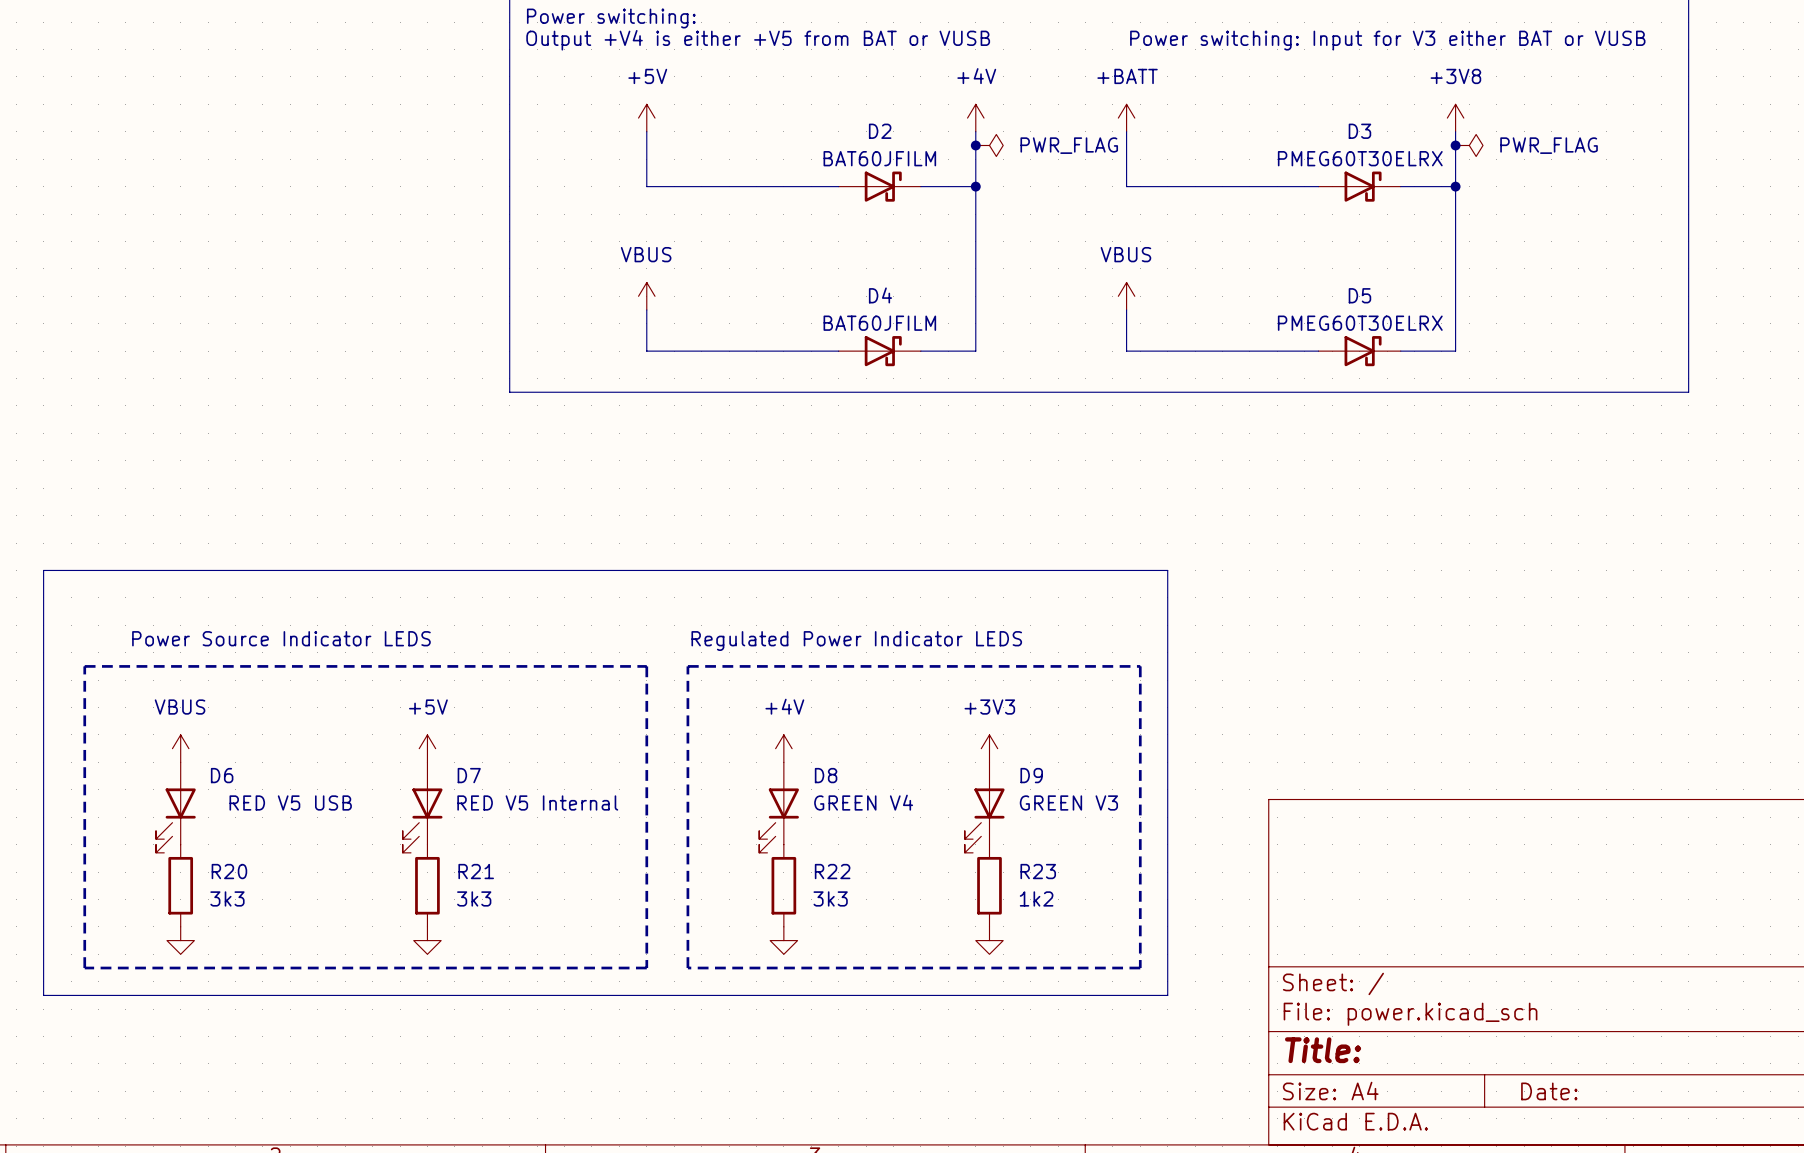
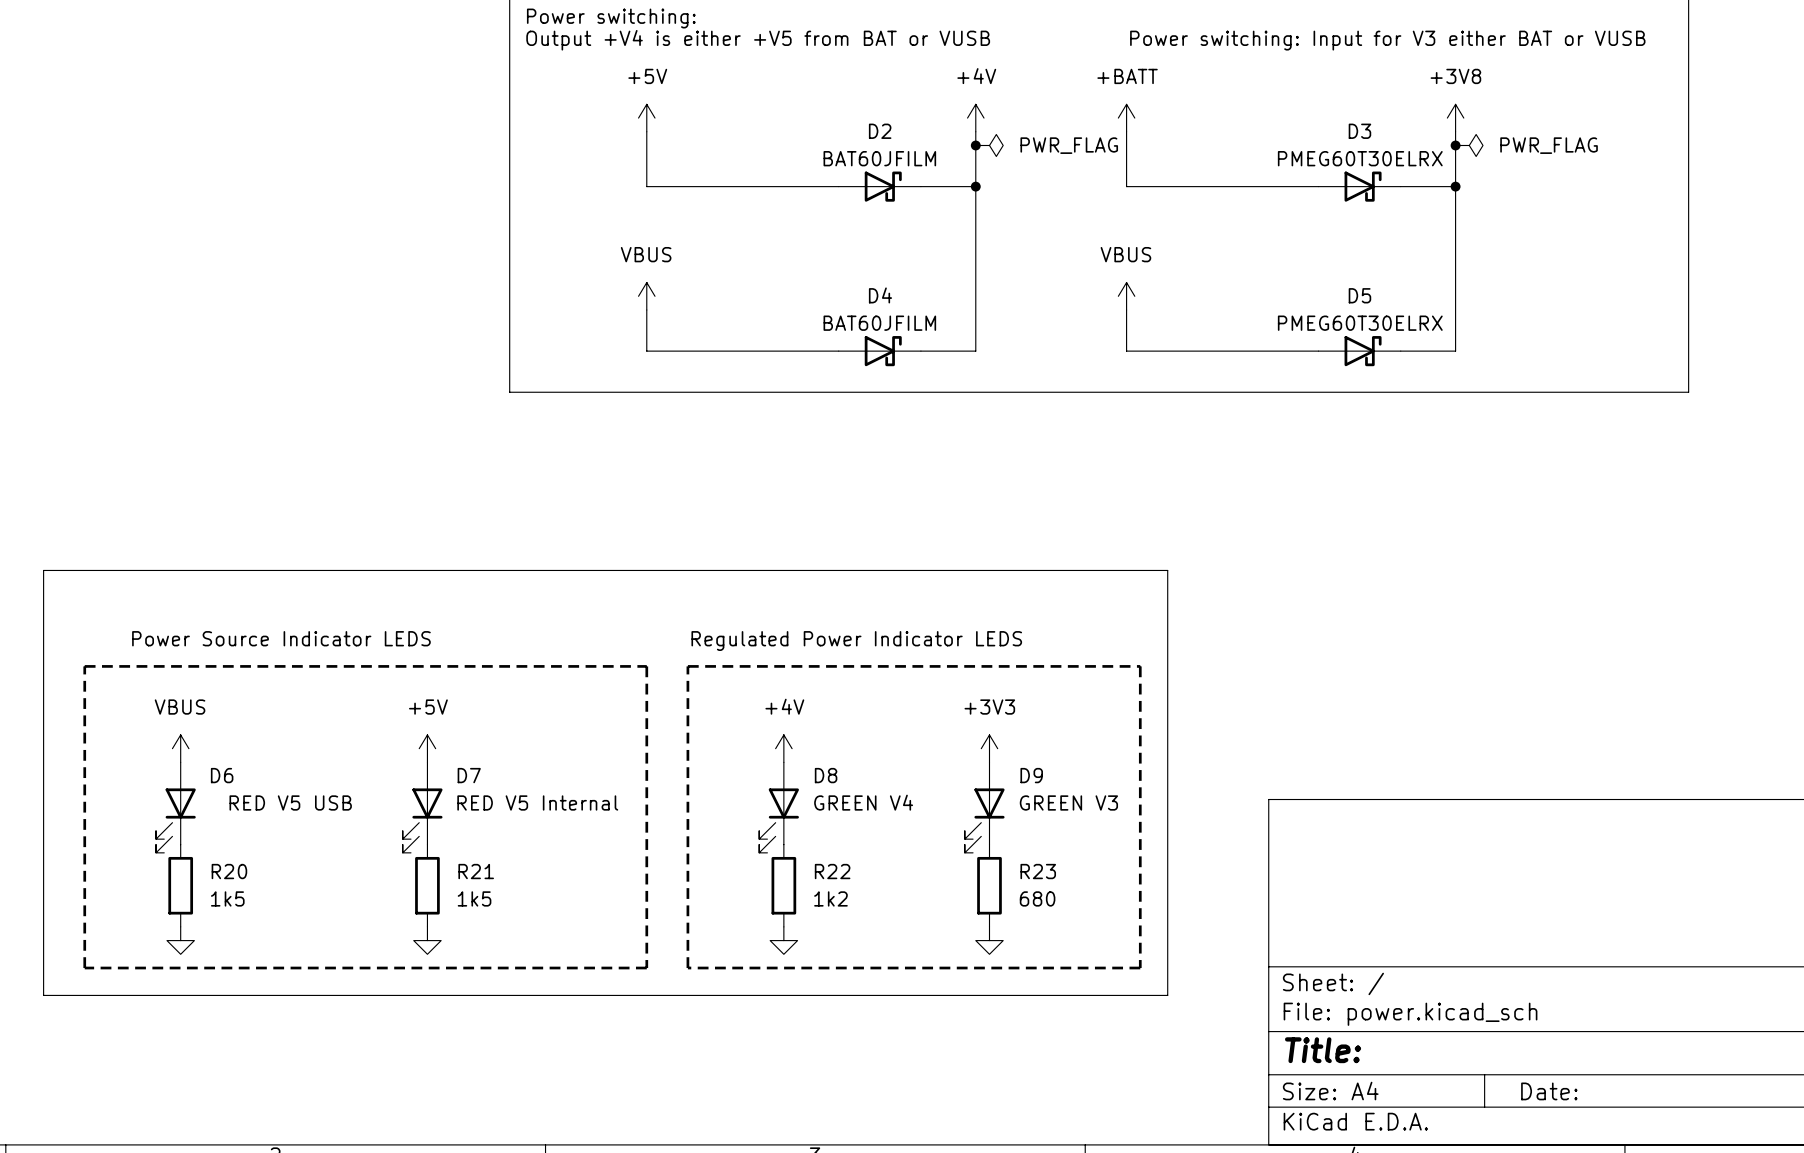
R20 value: 3k3 (227, 898) -> 1k5 (227, 898)
R21 value: 3k3 (474, 898) -> 1k5 (474, 898)
R22 value: 3k3 (830, 898) -> 1k2 (830, 898)
R23 value: 1k2 (1036, 898) -> 680 (1037, 898)

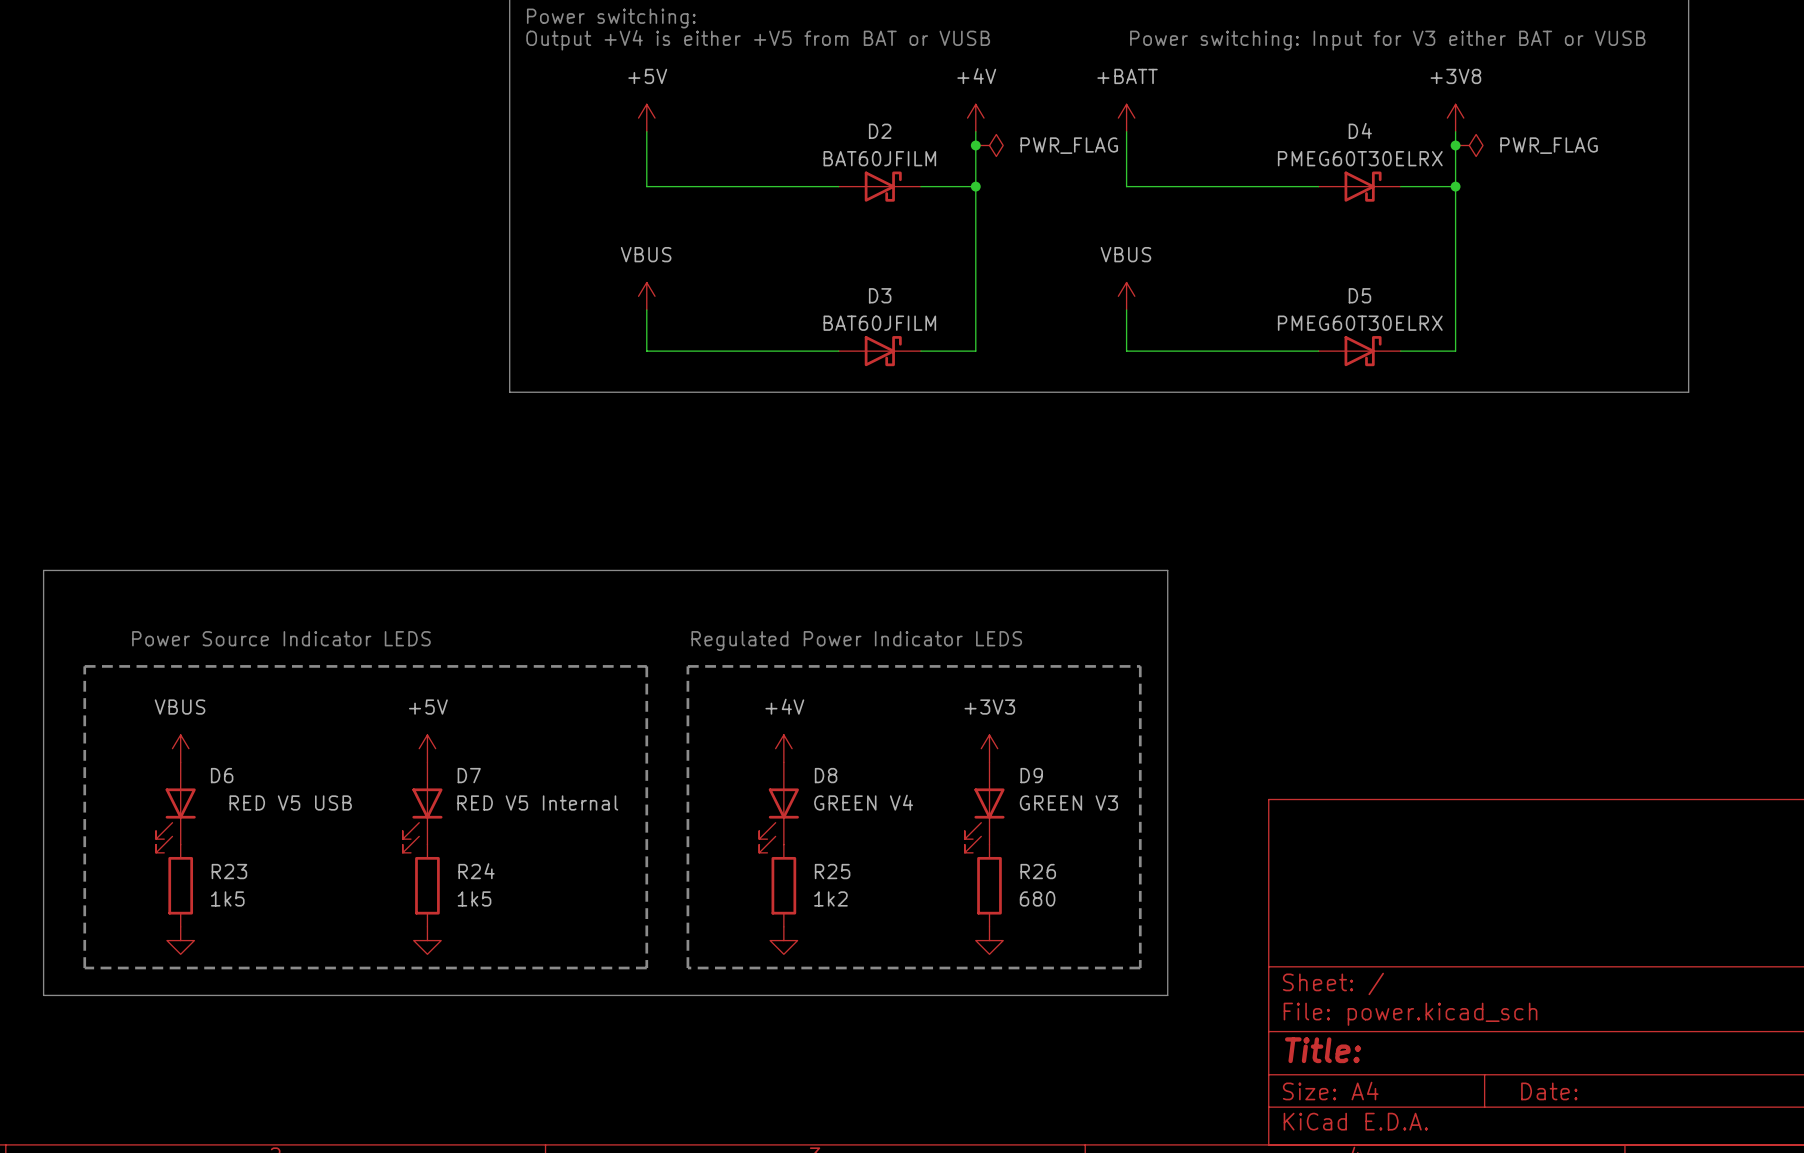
D3 name: D3 (1359, 131) -> D4 (1360, 130)
D4 name: D4 (880, 295) -> D3 (880, 295)
R20 name: R20 (229, 871) -> R23 (229, 871)
R21 name: R21 (476, 871) -> R24 (476, 871)
R22 name: R22 (832, 871) -> R25 (832, 871)
R23 name: R23 (1038, 871) -> R26 (1038, 871)

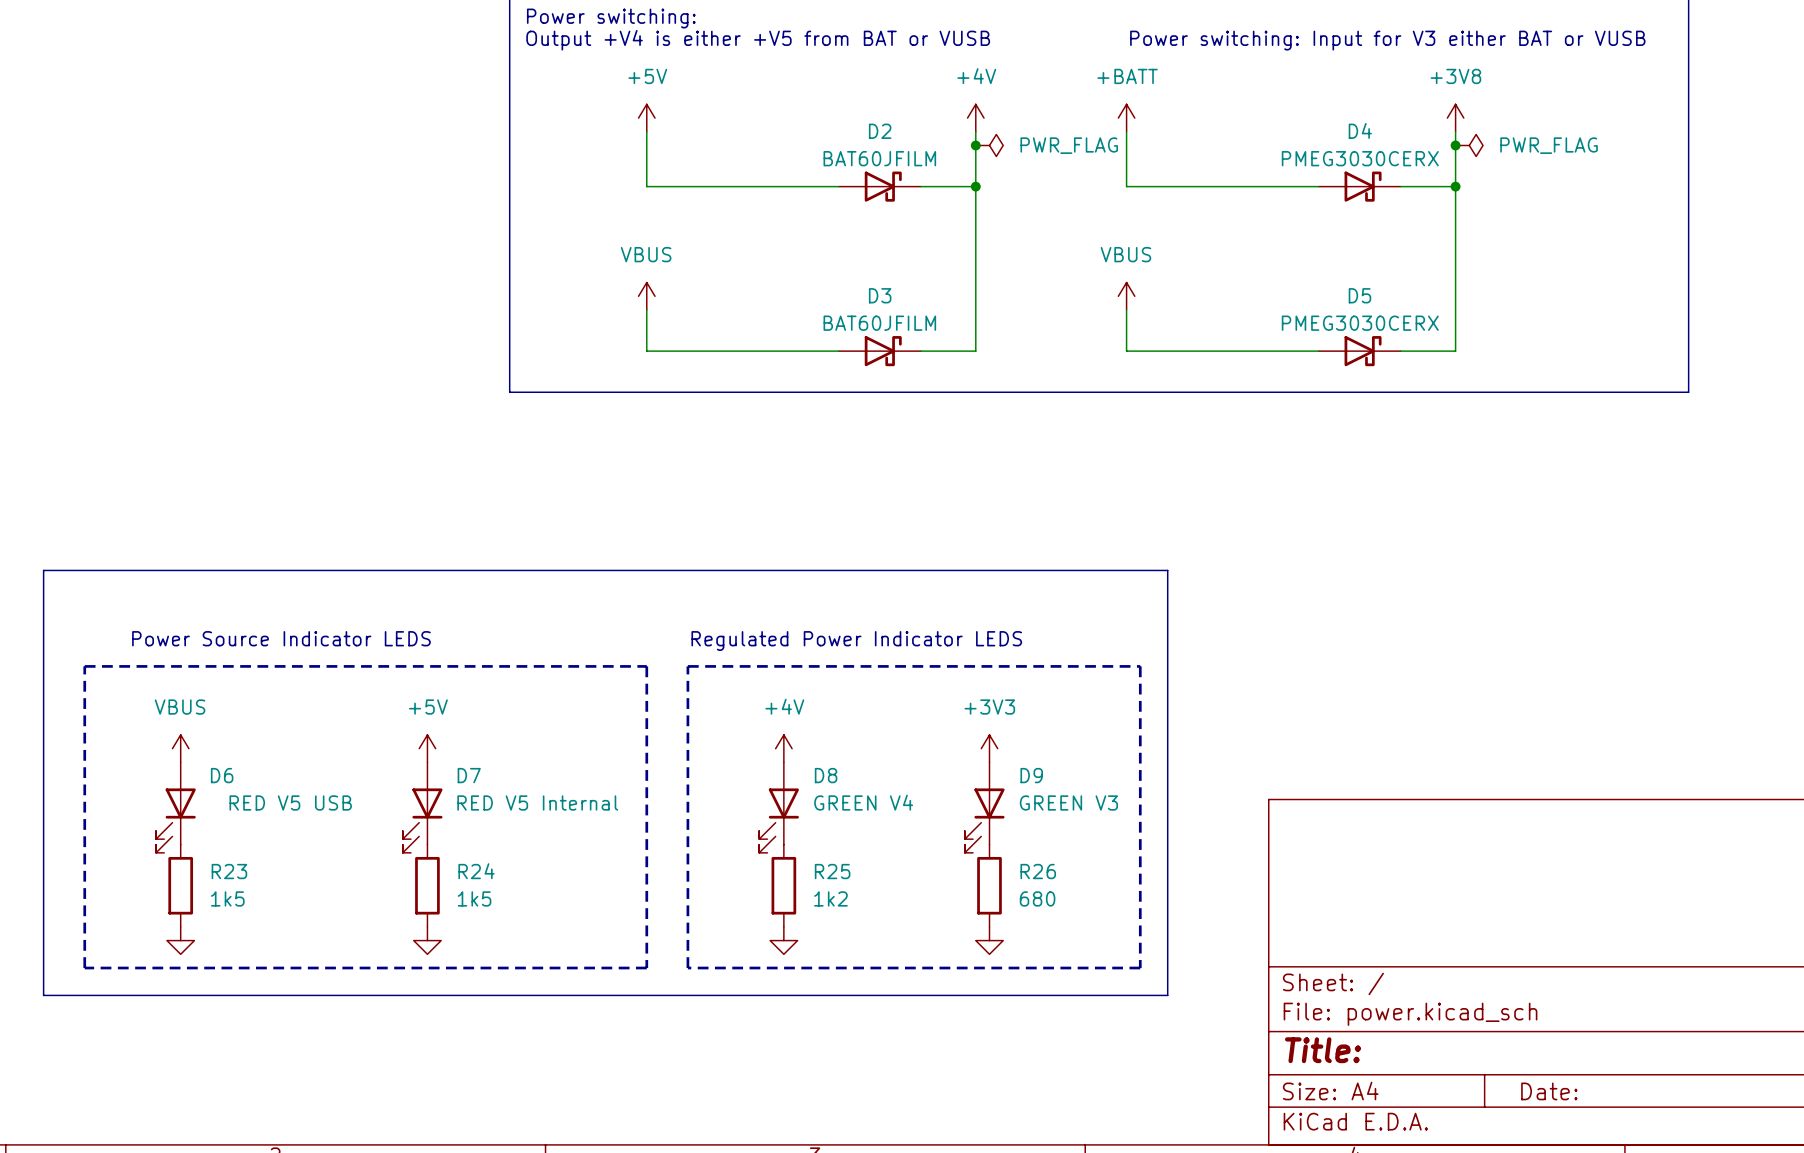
D4 value: PMEG60T30ELRX (1360, 158) -> PMEG3030CERX (1360, 158)
D5 value: PMEG60T30ELRX (1360, 323) -> PMEG3030CERX (1360, 323)

